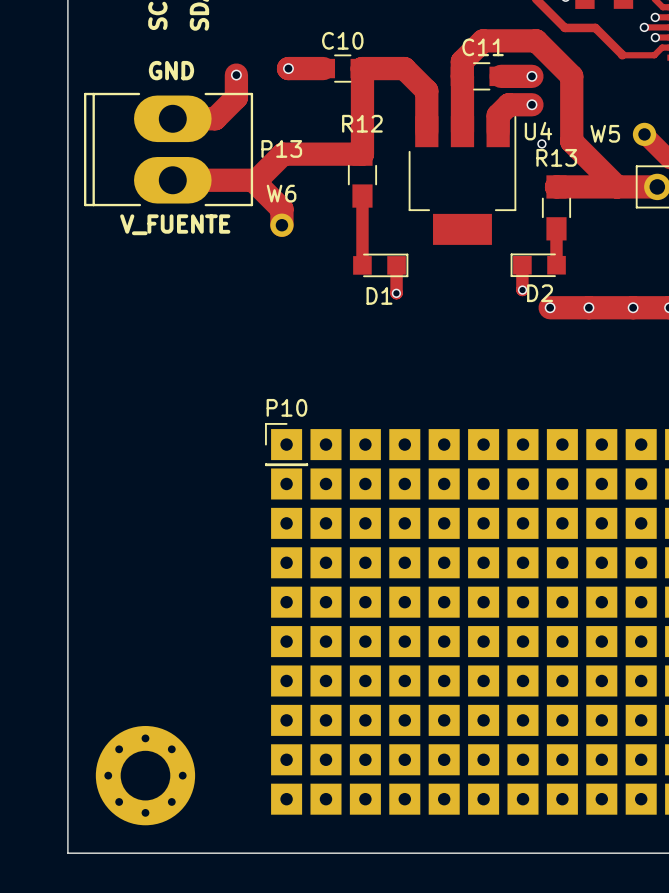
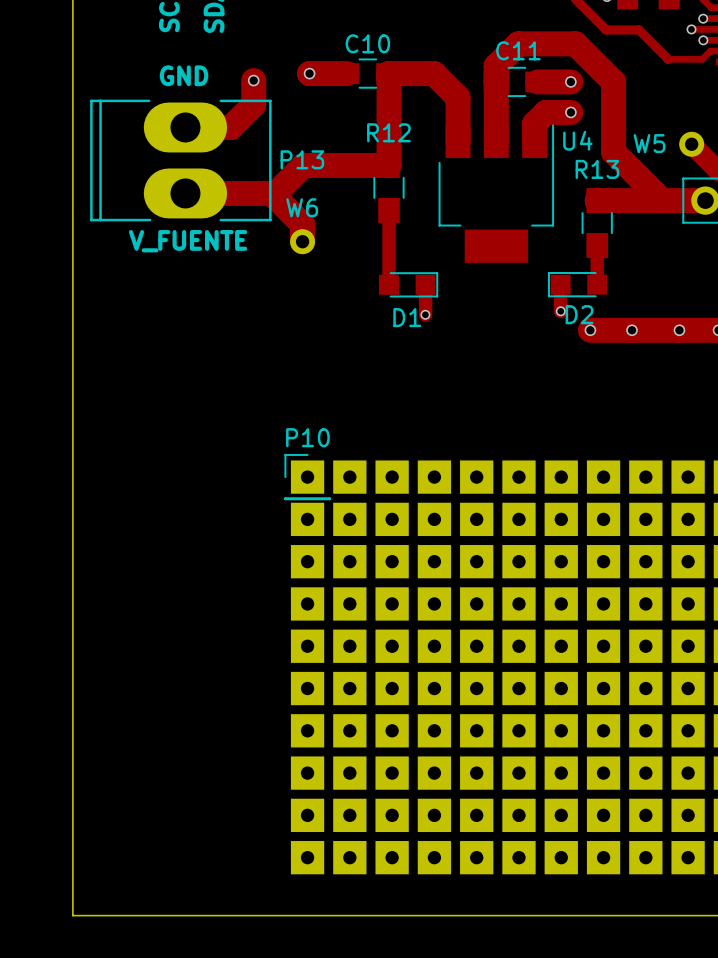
via: (541, 143) -> none
part: (145, 775) -> none

